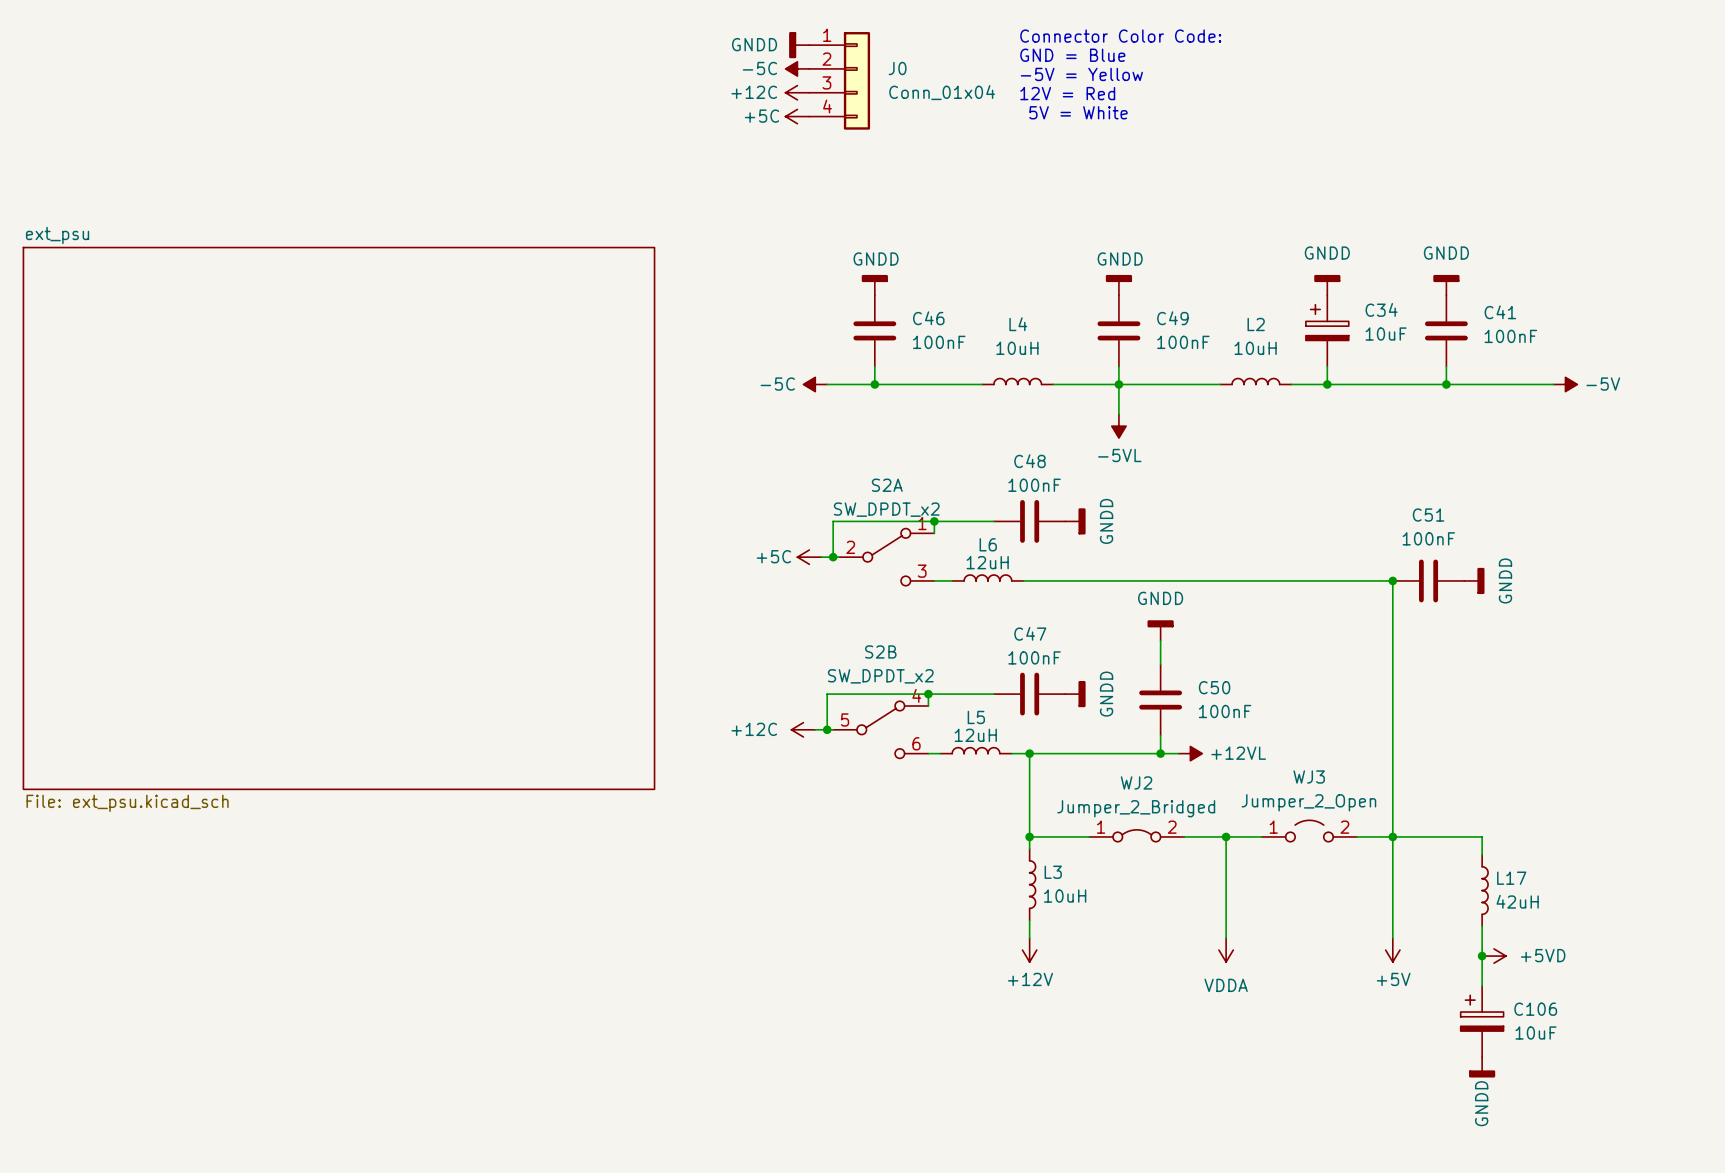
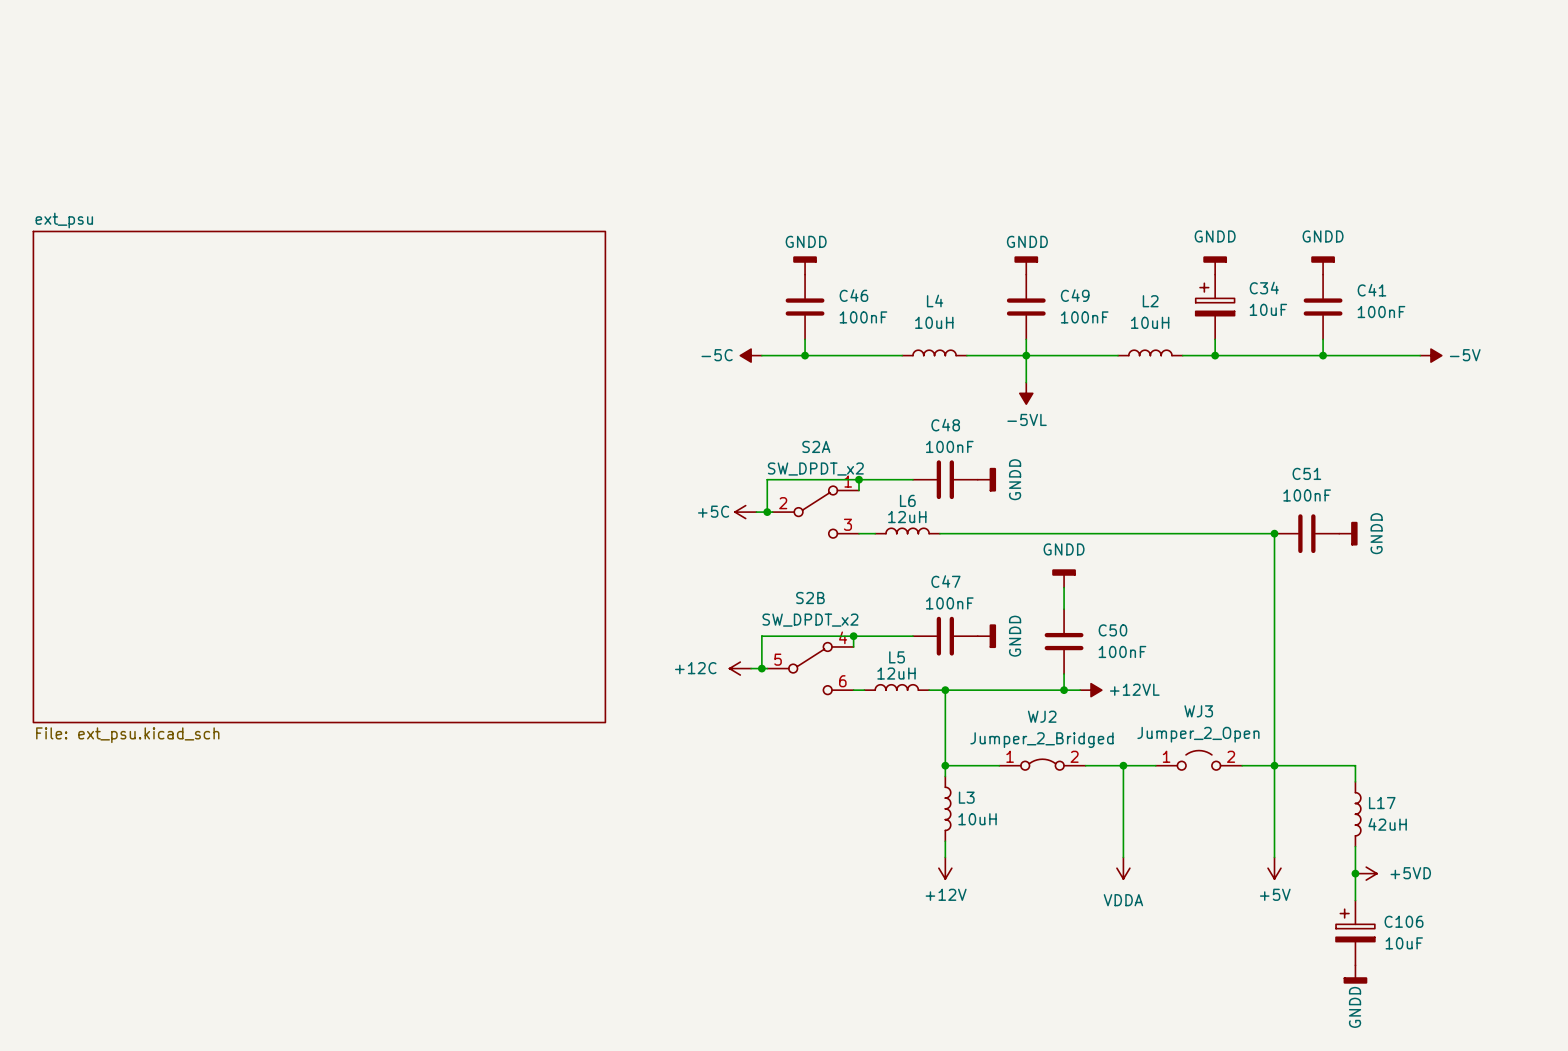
text: Connector Color Code: (1120, 36) -> none
power symbol: GNDD (799, 45) -> none
text: GND = Blue (1072, 55) -> none
power symbol: -5C (797, 68) -> none
text: -5V = Yellow (1081, 74) -> none
J0: Conn_01x04 (839, 80) -> none
power symbol: +12C (797, 92) -> none
text: 12V = Red (1067, 93) -> none
text: 5V = White (1078, 112) -> none
power symbol: +5C (797, 116) -> none

